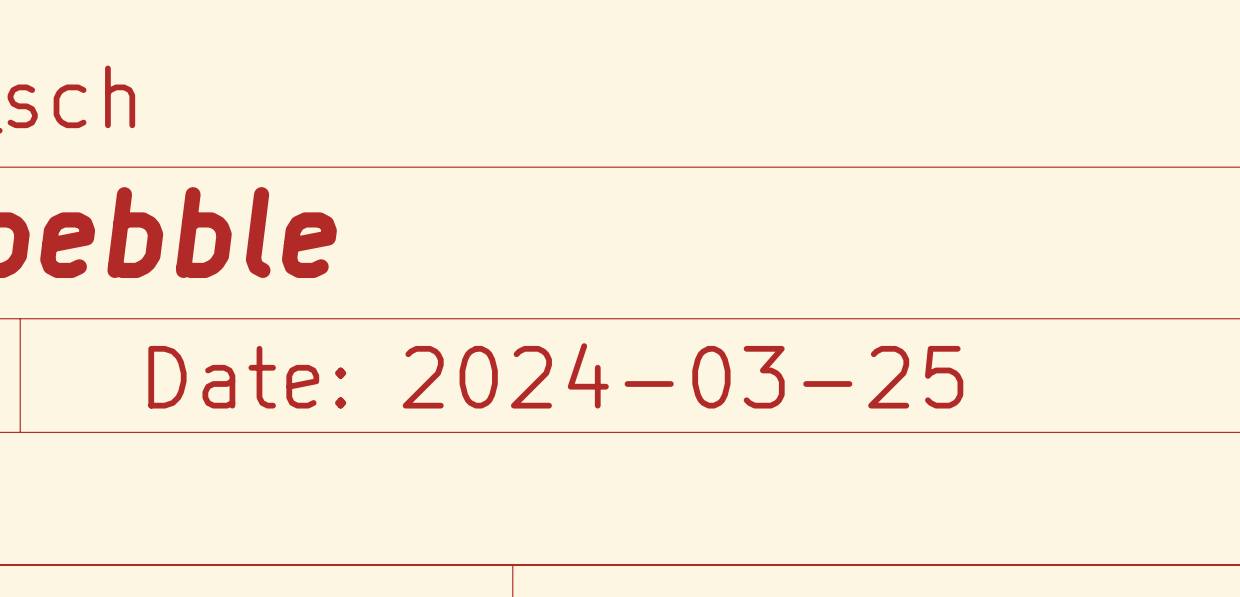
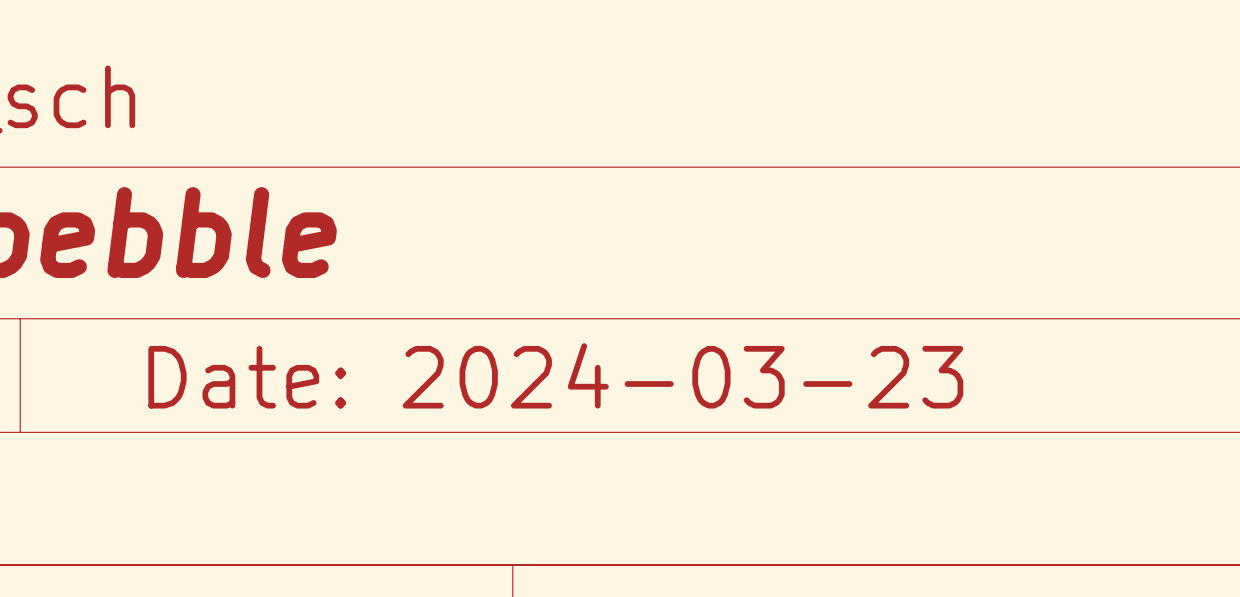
title block: Date: 2024-03-25 (555, 375) -> Date: 2024-03-23 (555, 375)

